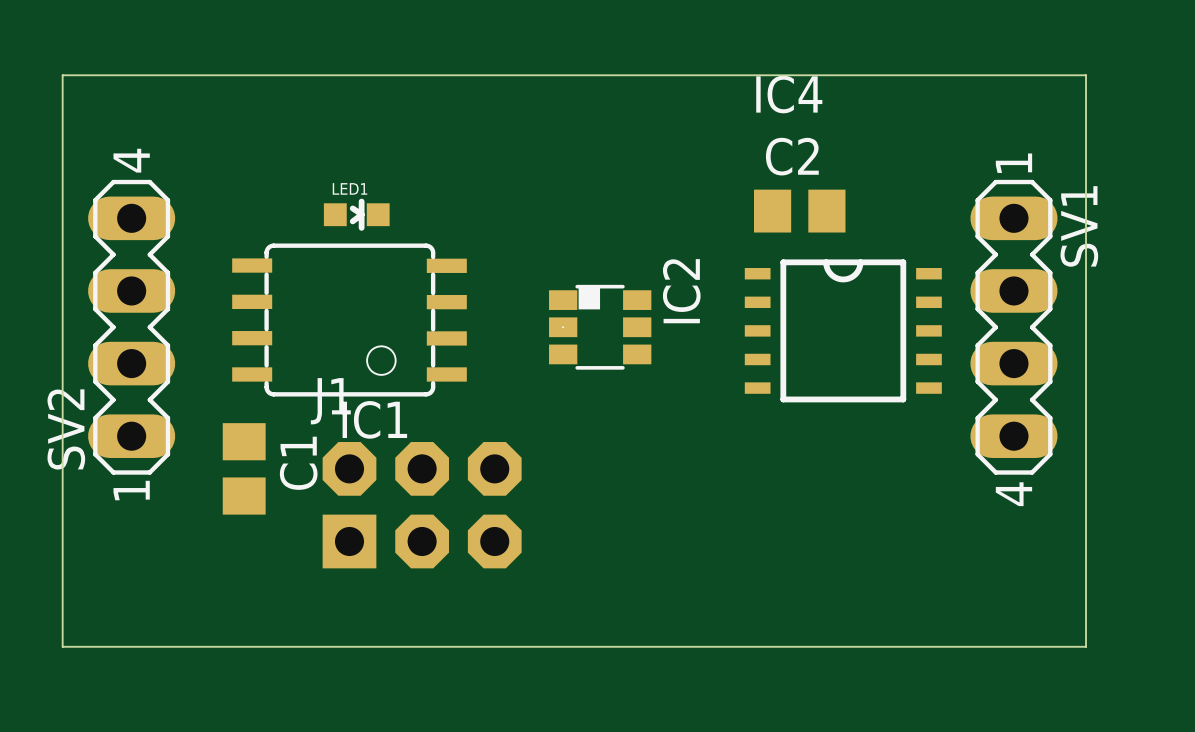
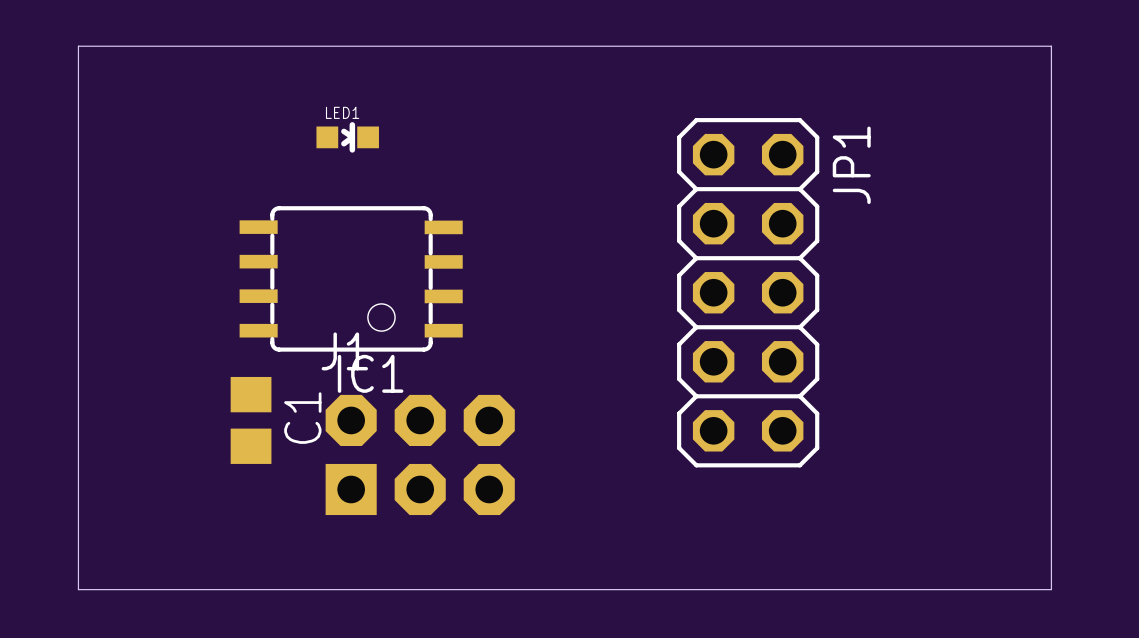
C2: (799, 211) -> none
LED1 position: (356, 214) -> (347, 137)
SV2: (131, 327) -> none
IC2: (600, 327) -> none
SV1: (1013, 327) -> none
IC4: (843, 330) -> none
JP1: none -> (748, 292)

